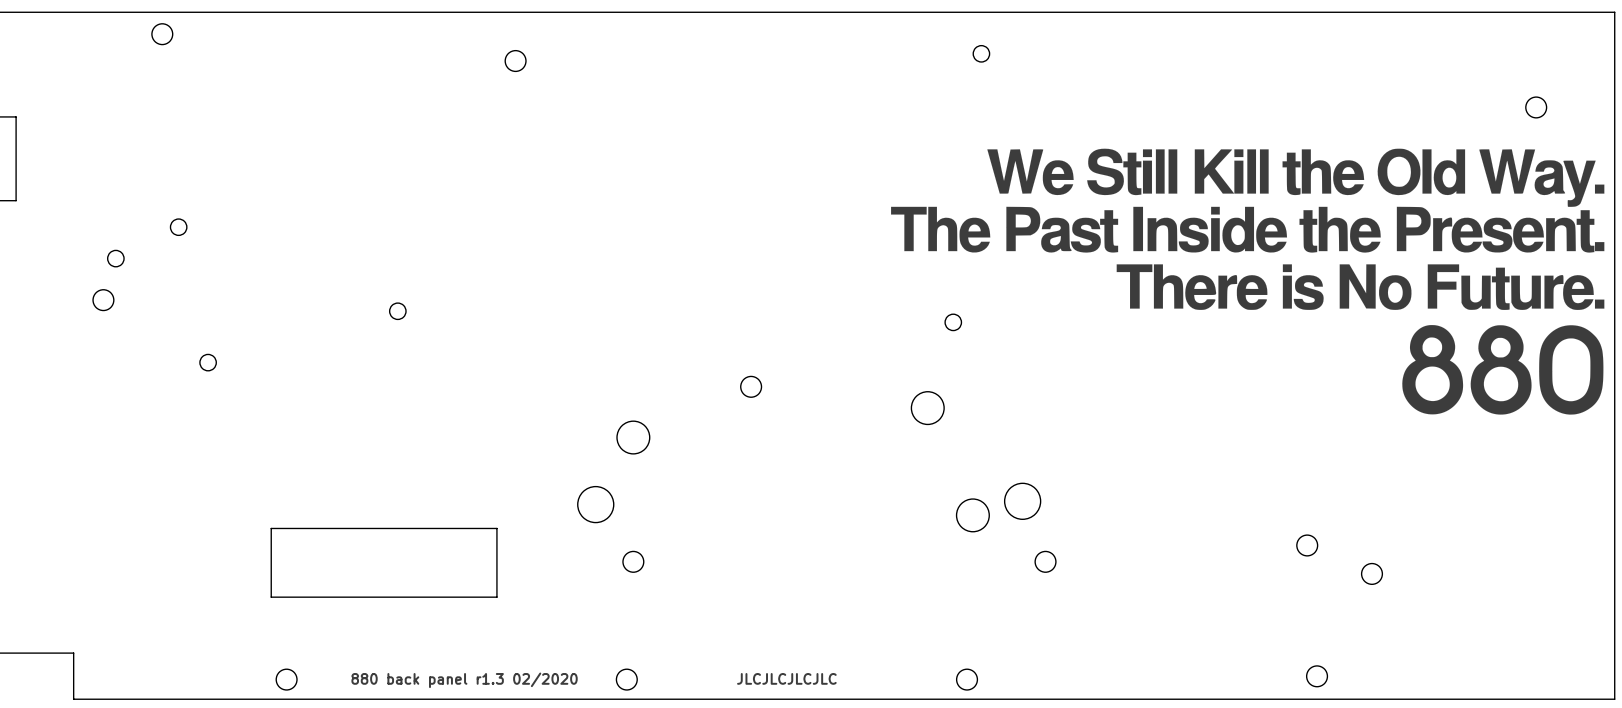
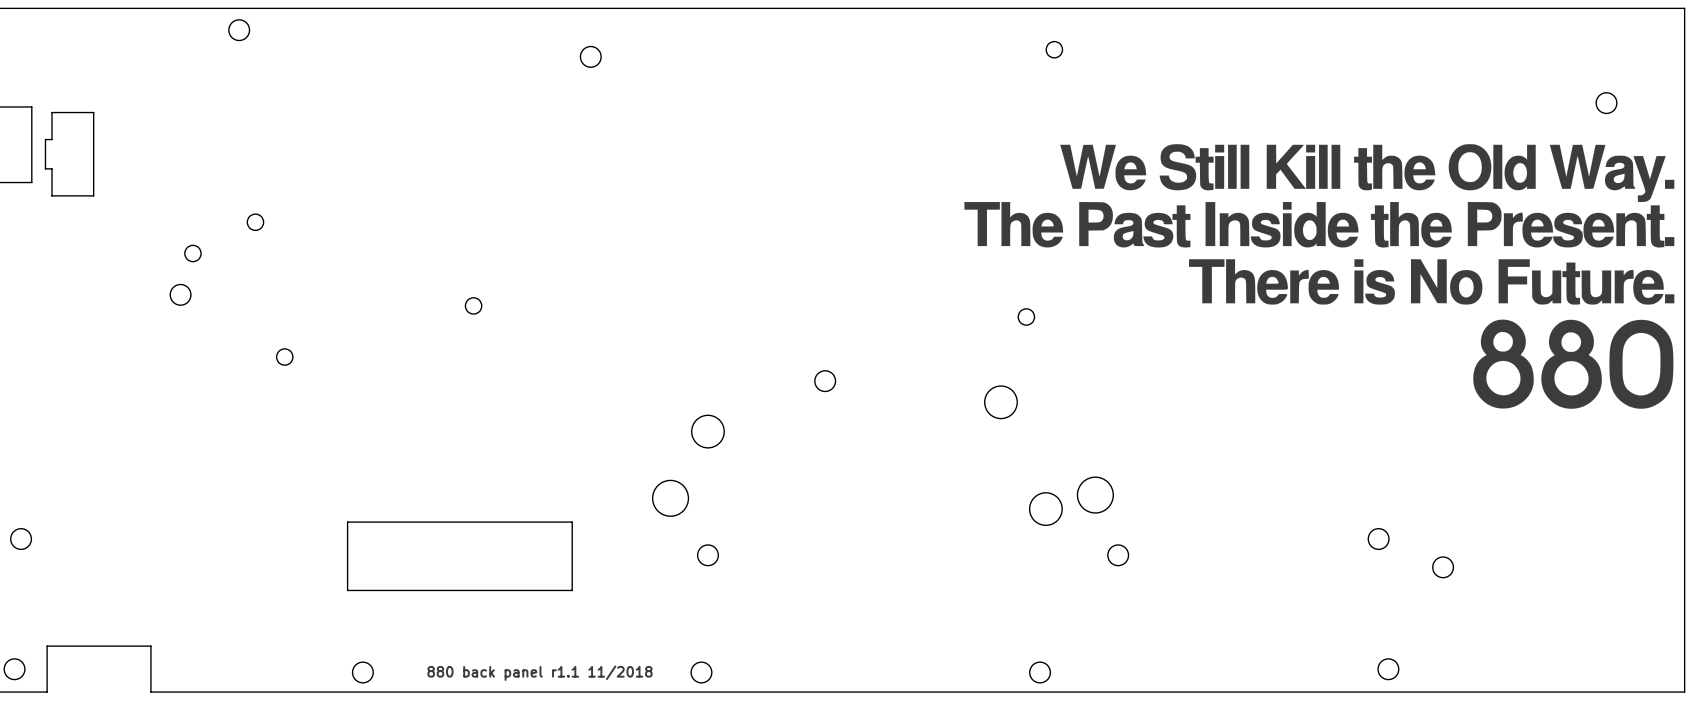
text: JLCJLCJLCJLC (786, 678) -> none
text: 880 back panel r1.3 02/2020 (464, 680) -> 880 back panel r1.1 11/2018 (539, 673)

